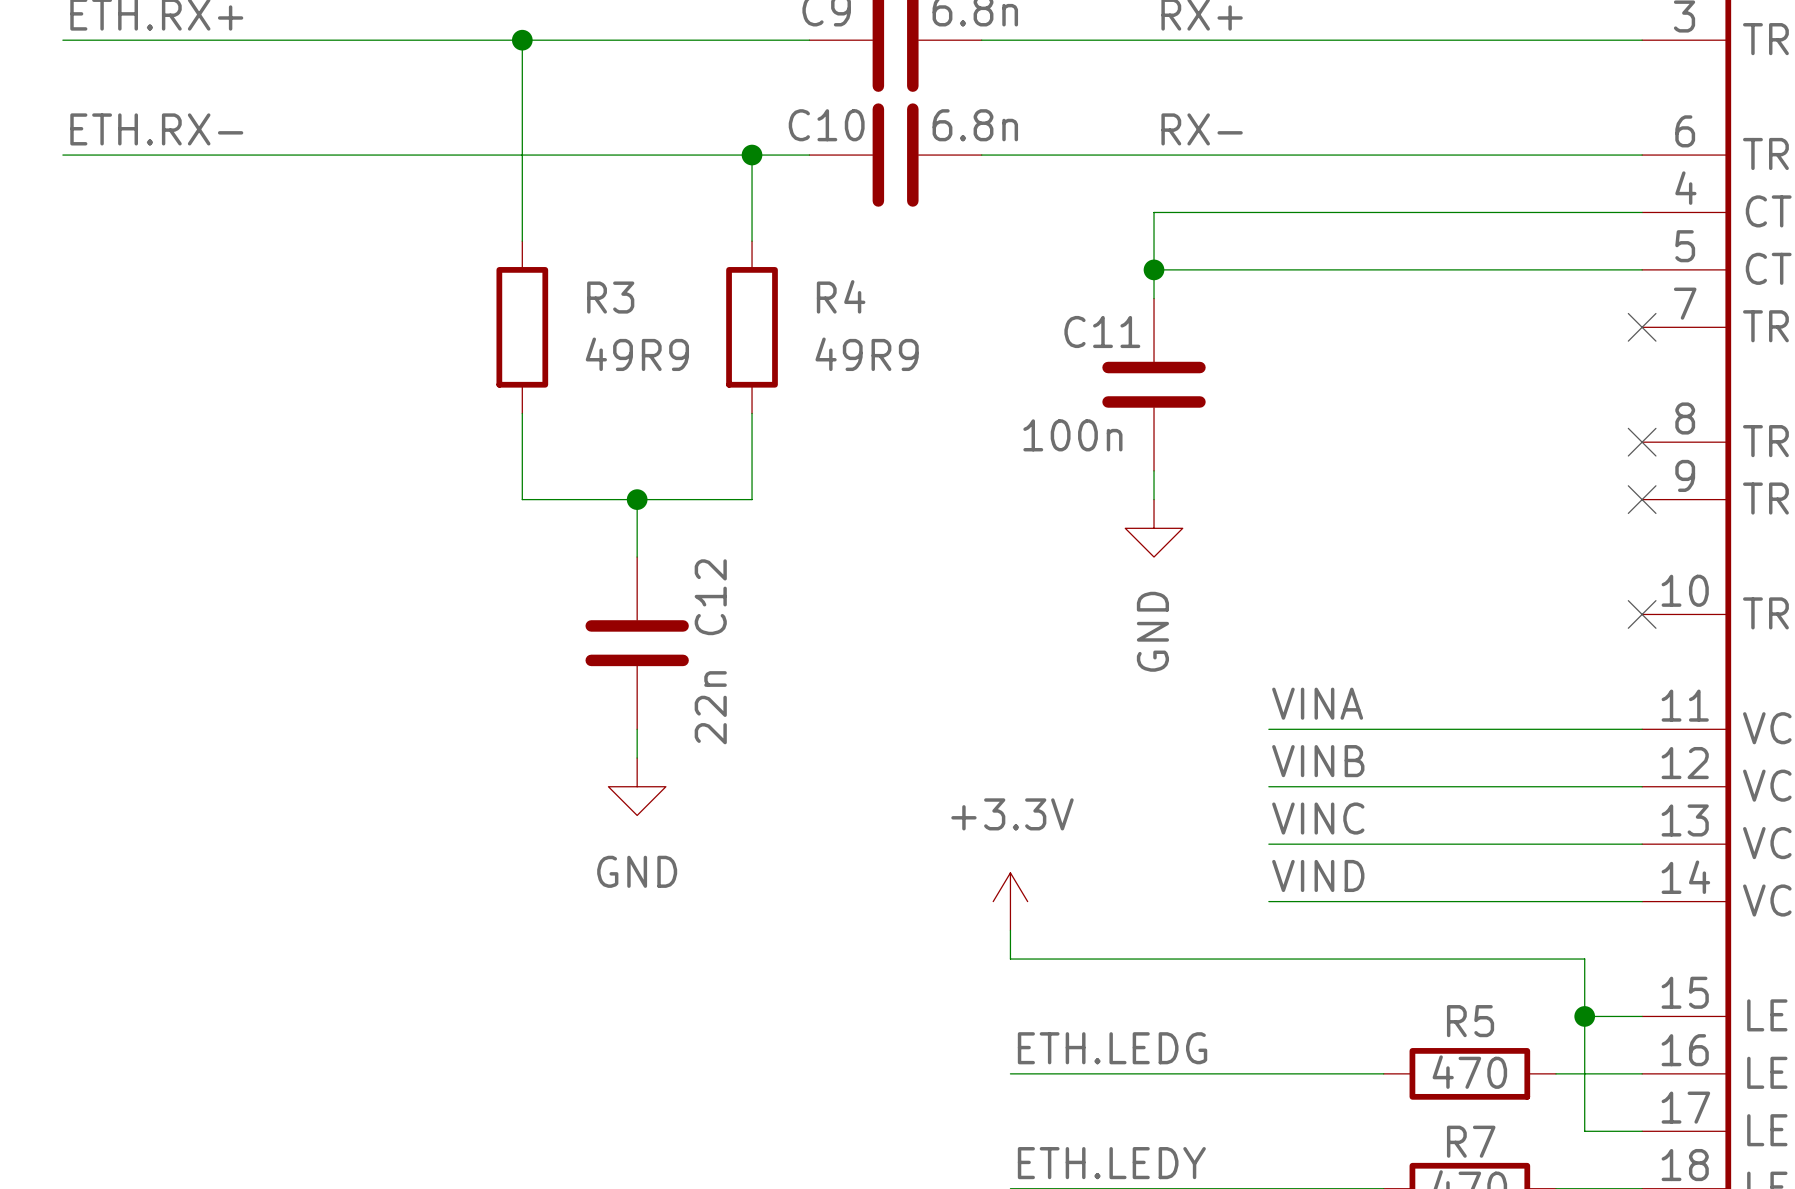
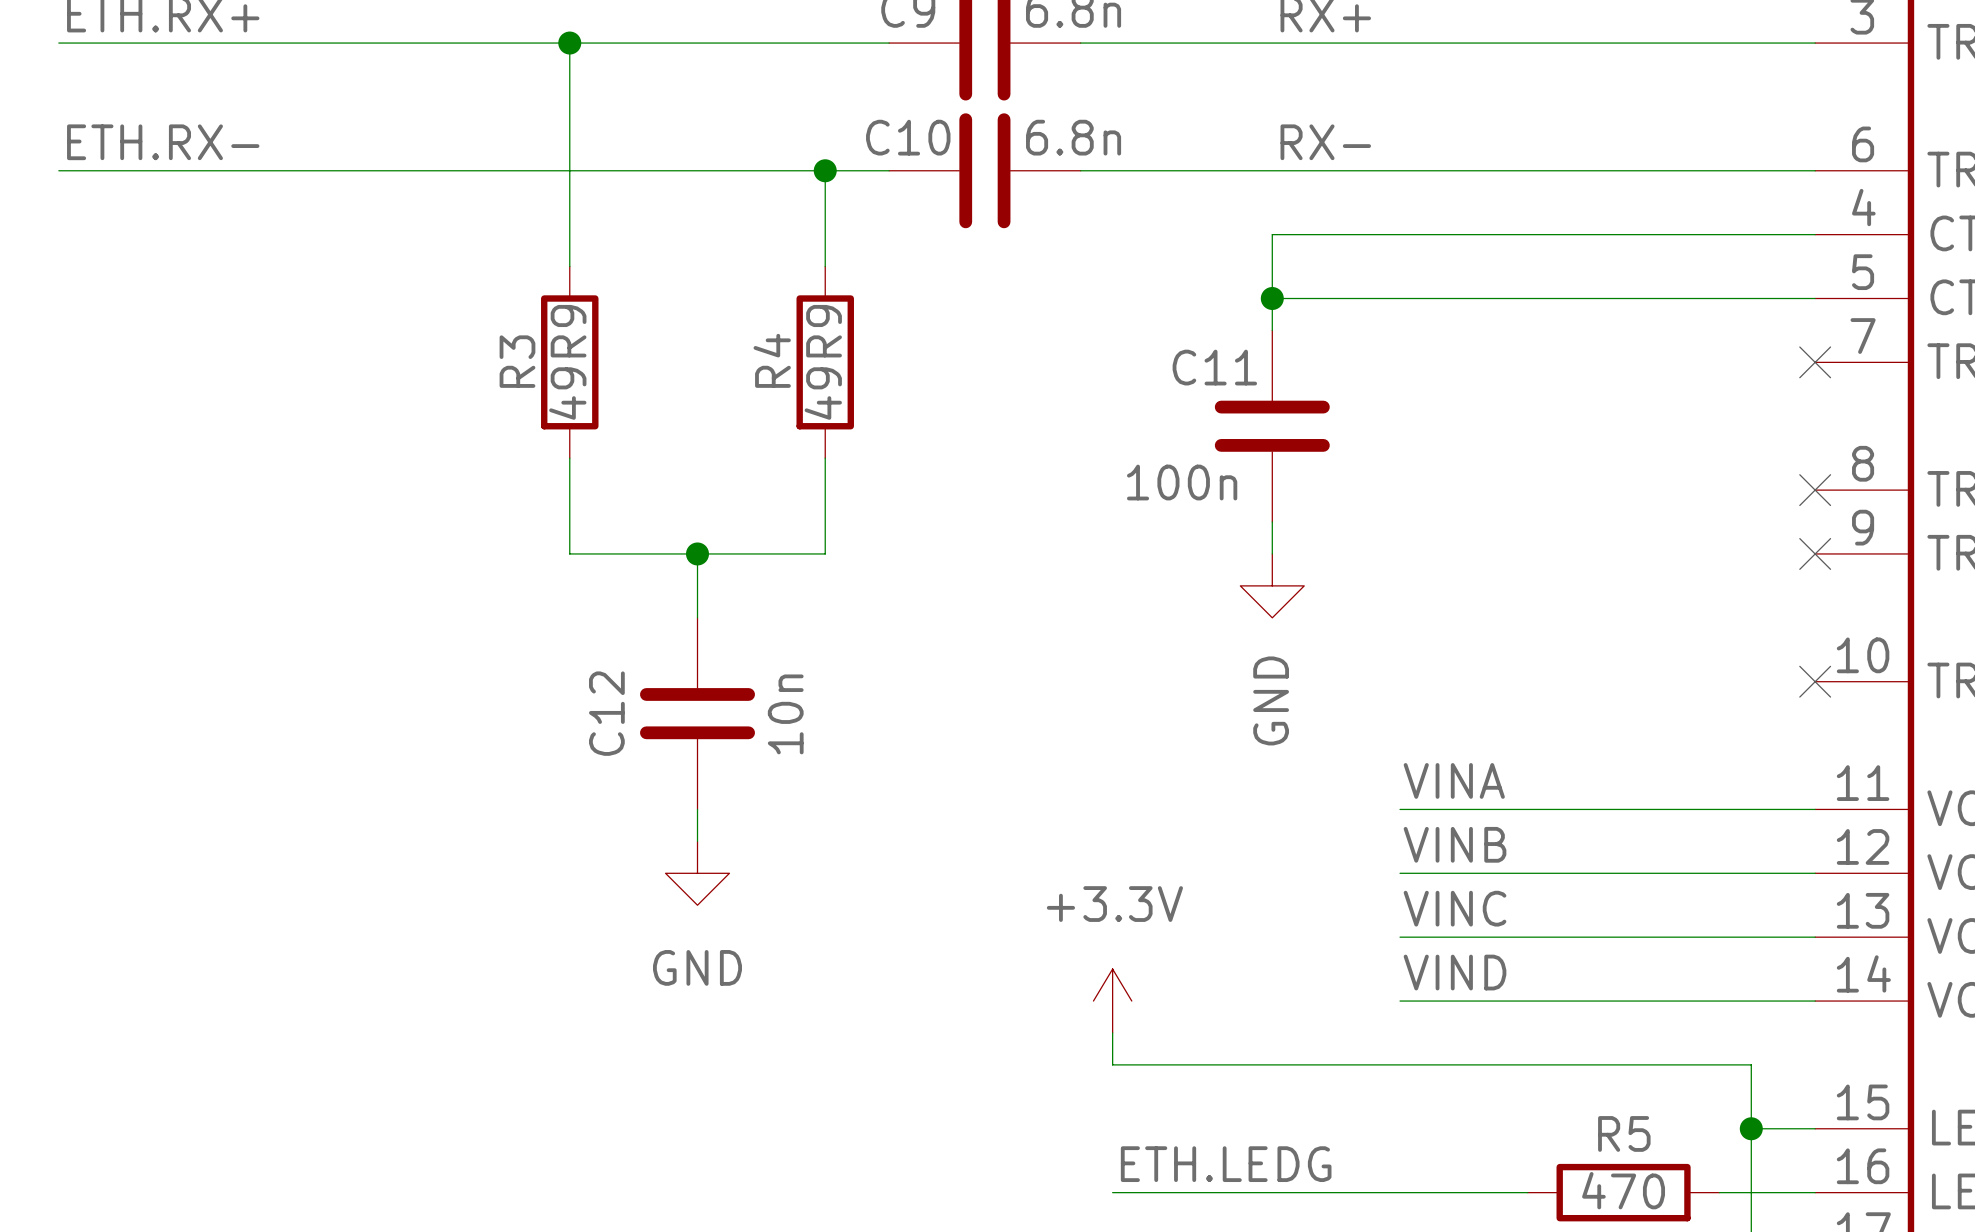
R4 name rotation: 0° (841, 296) -> 90° counterclockwise (772, 360)
R4 name position: R4 (841, 296) -> R4 (772, 360)
R3 name rotation: 0° (610, 297) -> 90° counterclockwise (517, 361)
R3 name position: R3 (610, 297) -> R3 (517, 361)
R3 value rotation: 0° (637, 354) -> 90° counterclockwise (567, 362)
R4 value rotation: 0° (867, 354) -> 90° counterclockwise (823, 362)
C12 name position: C12 (710, 597) -> C12 (606, 713)
C12 value: 22n (710, 707) -> 10n (785, 714)

